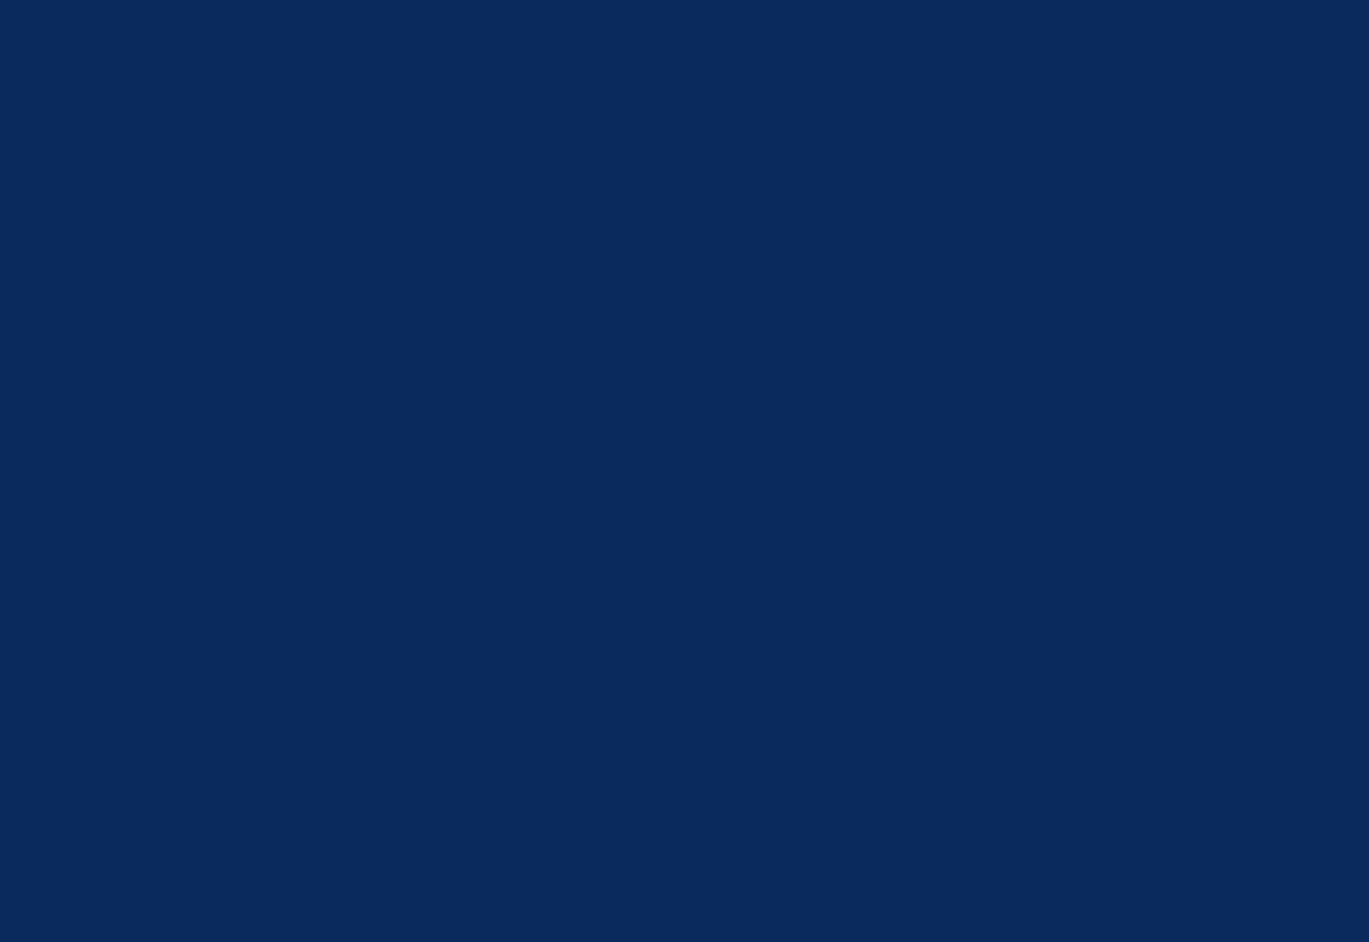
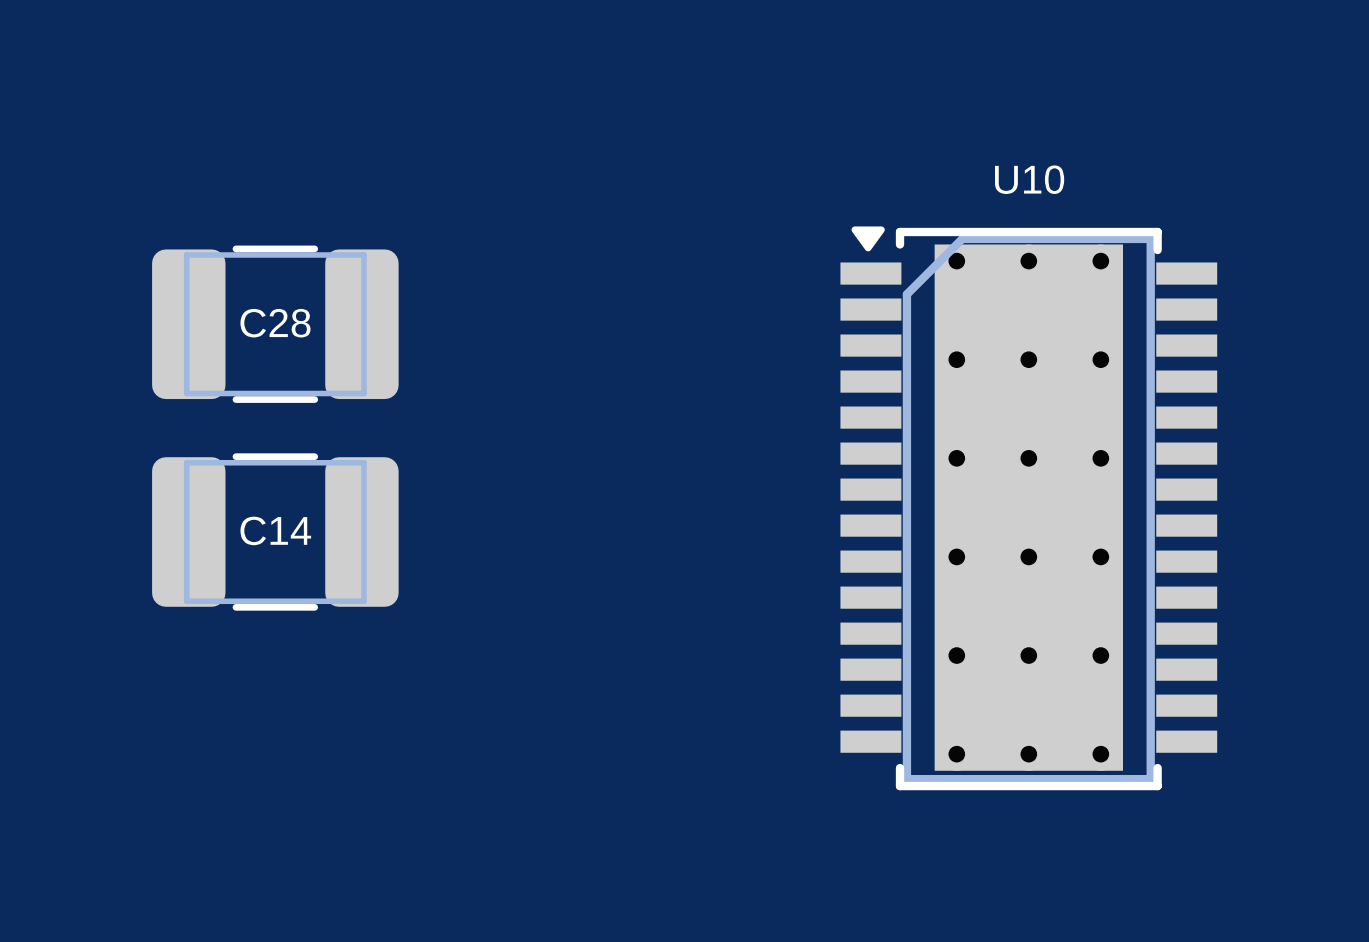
C28: none -> (275, 324)
U10: none -> (1028, 508)
C14: none -> (275, 532)

